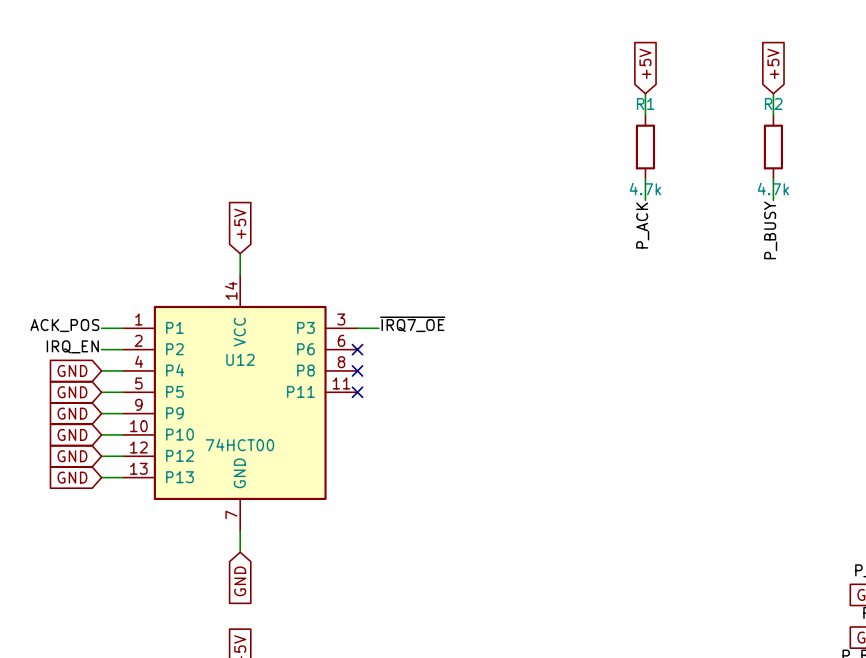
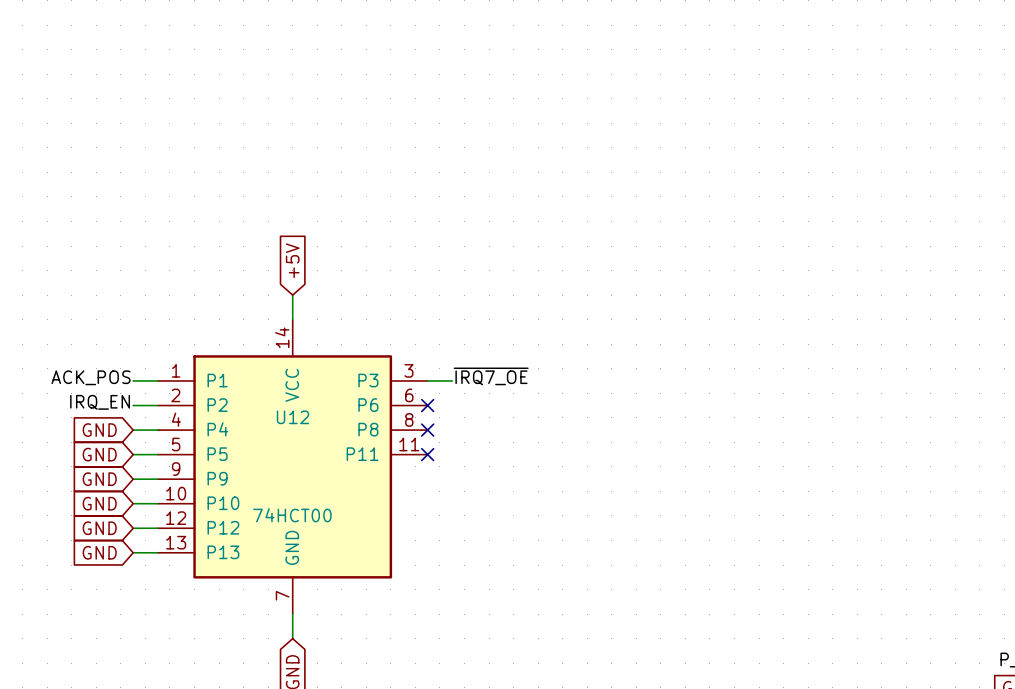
global label: +5V (645, 63) -> none
global label: +5V (773, 63) -> none
wire: (645, 93) (645, 115) -> none
wire: (773, 93) (773, 115) -> none
R1: 4.7k (645, 147) -> none
R2: 4.7k (773, 147) -> none
wire: (645, 179) (645, 200) -> none
wire: (773, 179) (773, 200) -> none
label: P_ACK (642, 225) -> none
label: P_BUSY (770, 230) -> none

